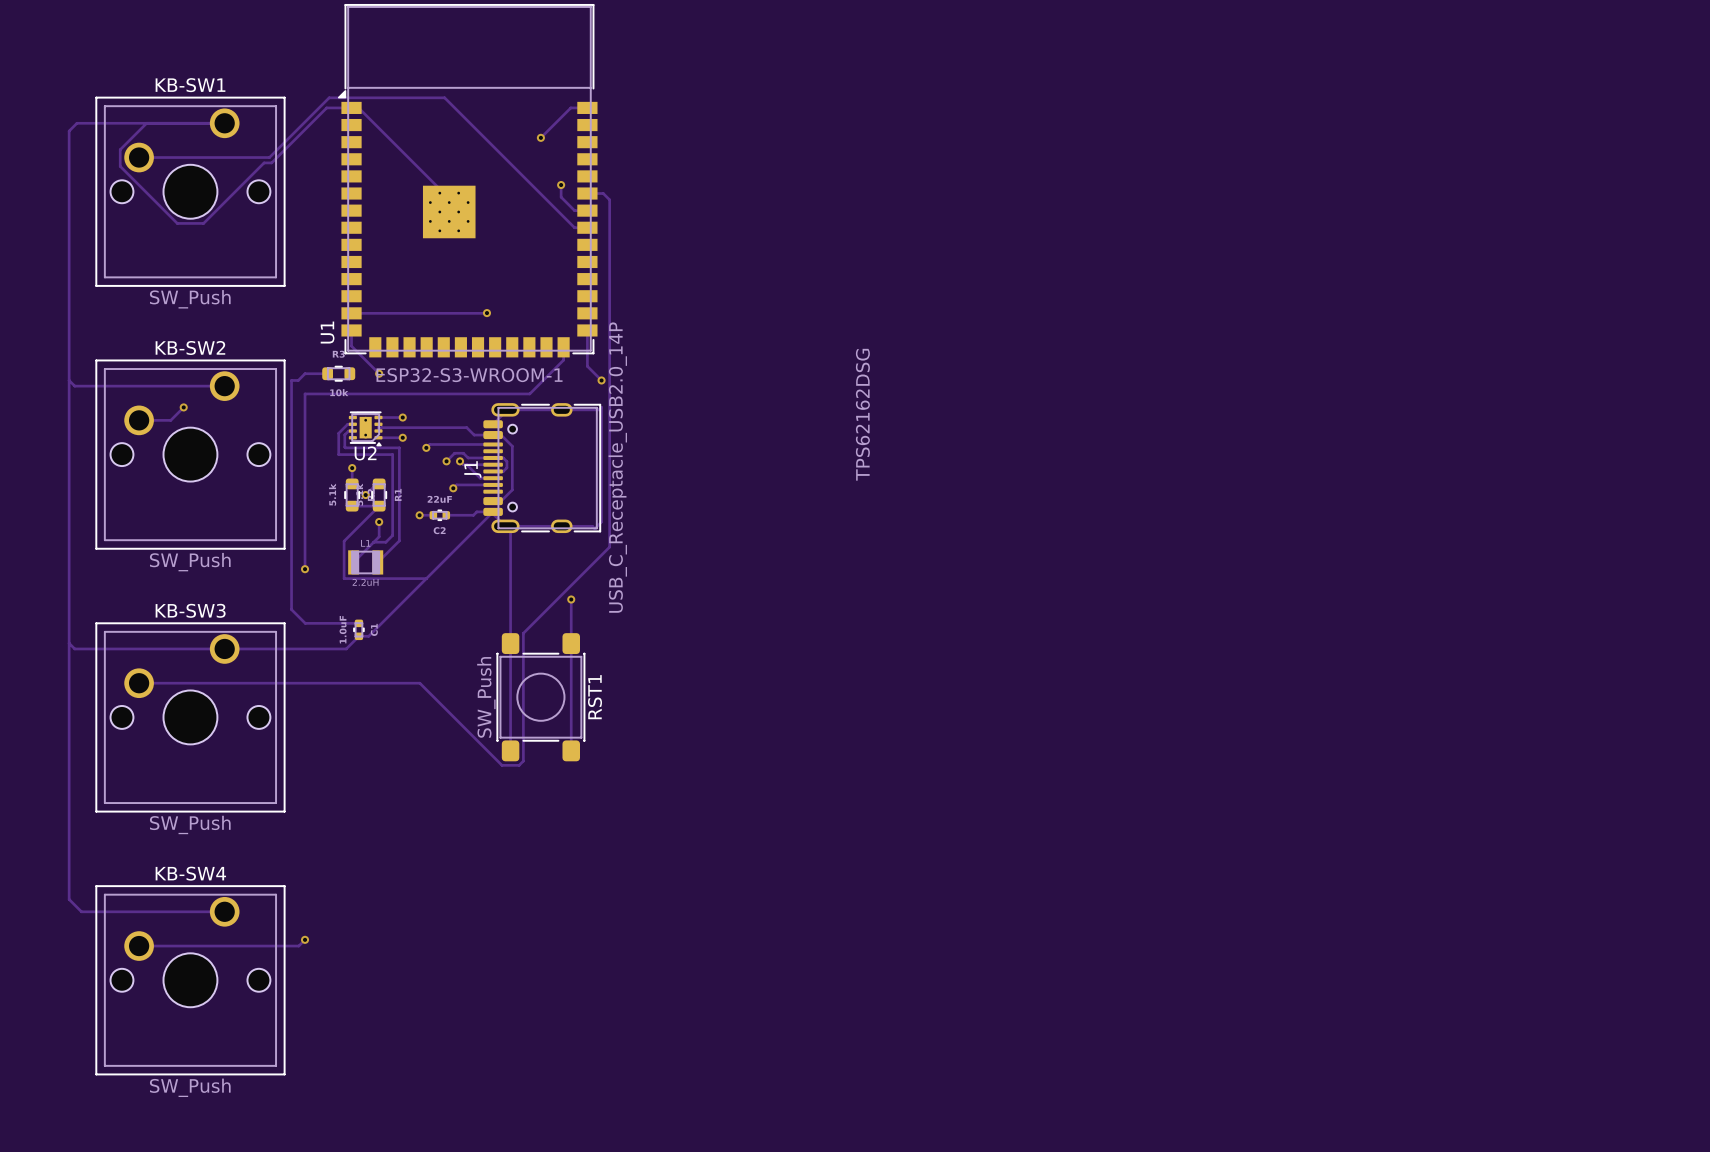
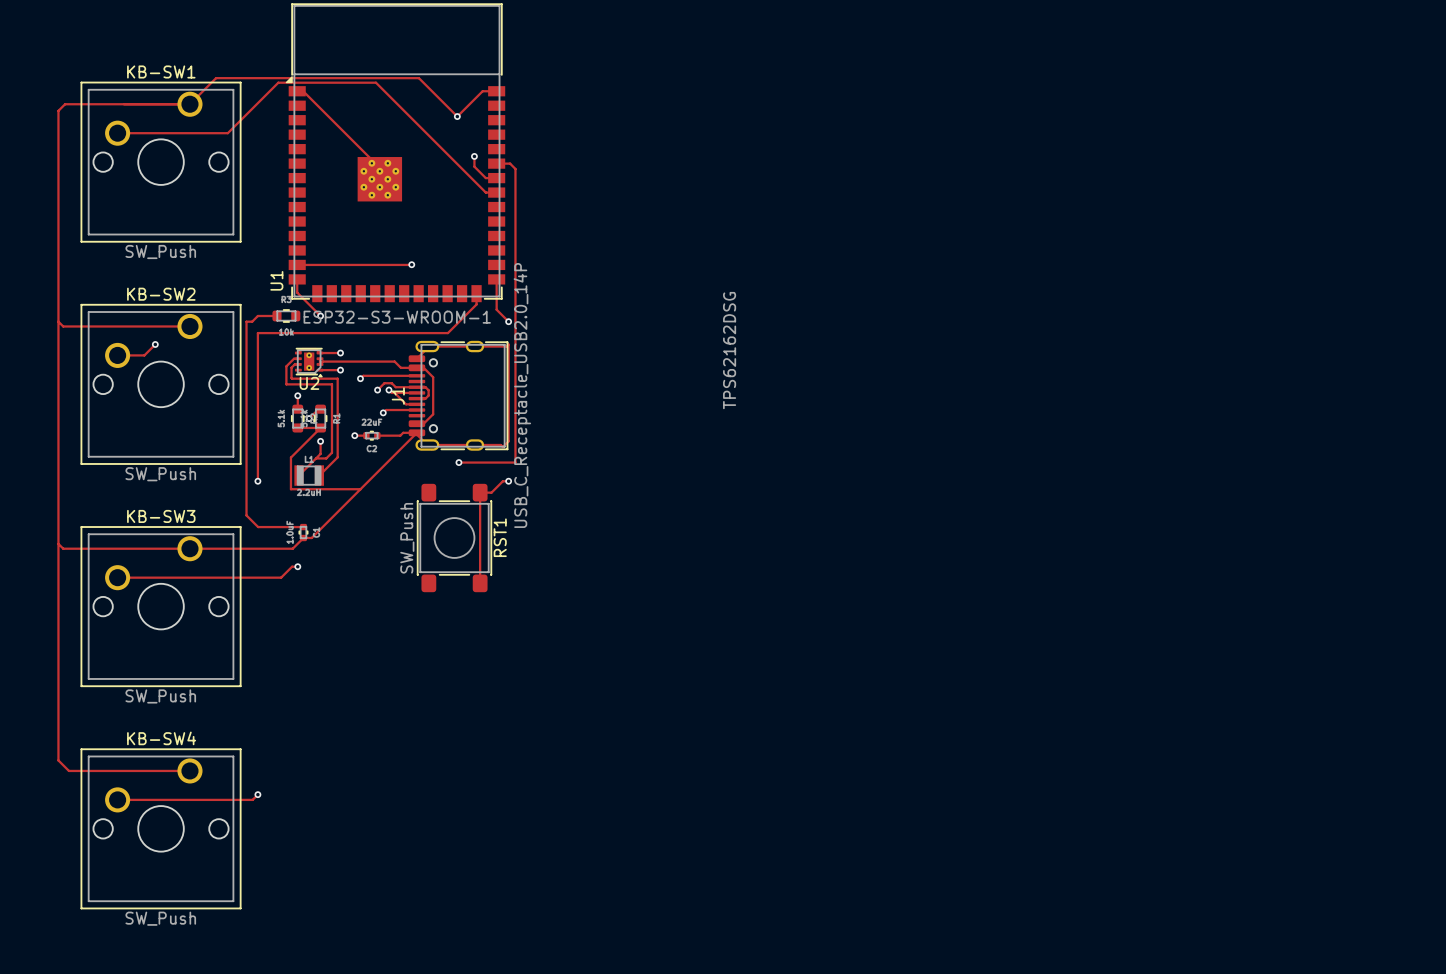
track: (351, 107) (326, 107) (271, 162) (264, 162) (203, 223) (177, 223) (120, 166) (120, 149) (146, 123) -> none
track: none -> (189, 104) (216, 78) (418, 78) (457, 116)
track: (510, 531) (510, 750) -> none
via: none -> (458, 462)
track: (609, 547) (523, 633) (523, 761) (519, 765) (502, 765) (419, 683) (332, 683) -> (515, 462) (458, 462)
track: none -> (508, 481) (502, 481) (491, 492) (480, 492) (480, 583)
via: none -> (508, 481)
track: (571, 599) (571, 750) -> none
via: (571, 599) -> none
track: none -> (297, 566) (292, 566) (281, 577)
via: none -> (297, 566)
RST1 position: (540, 697) -> (454, 538)

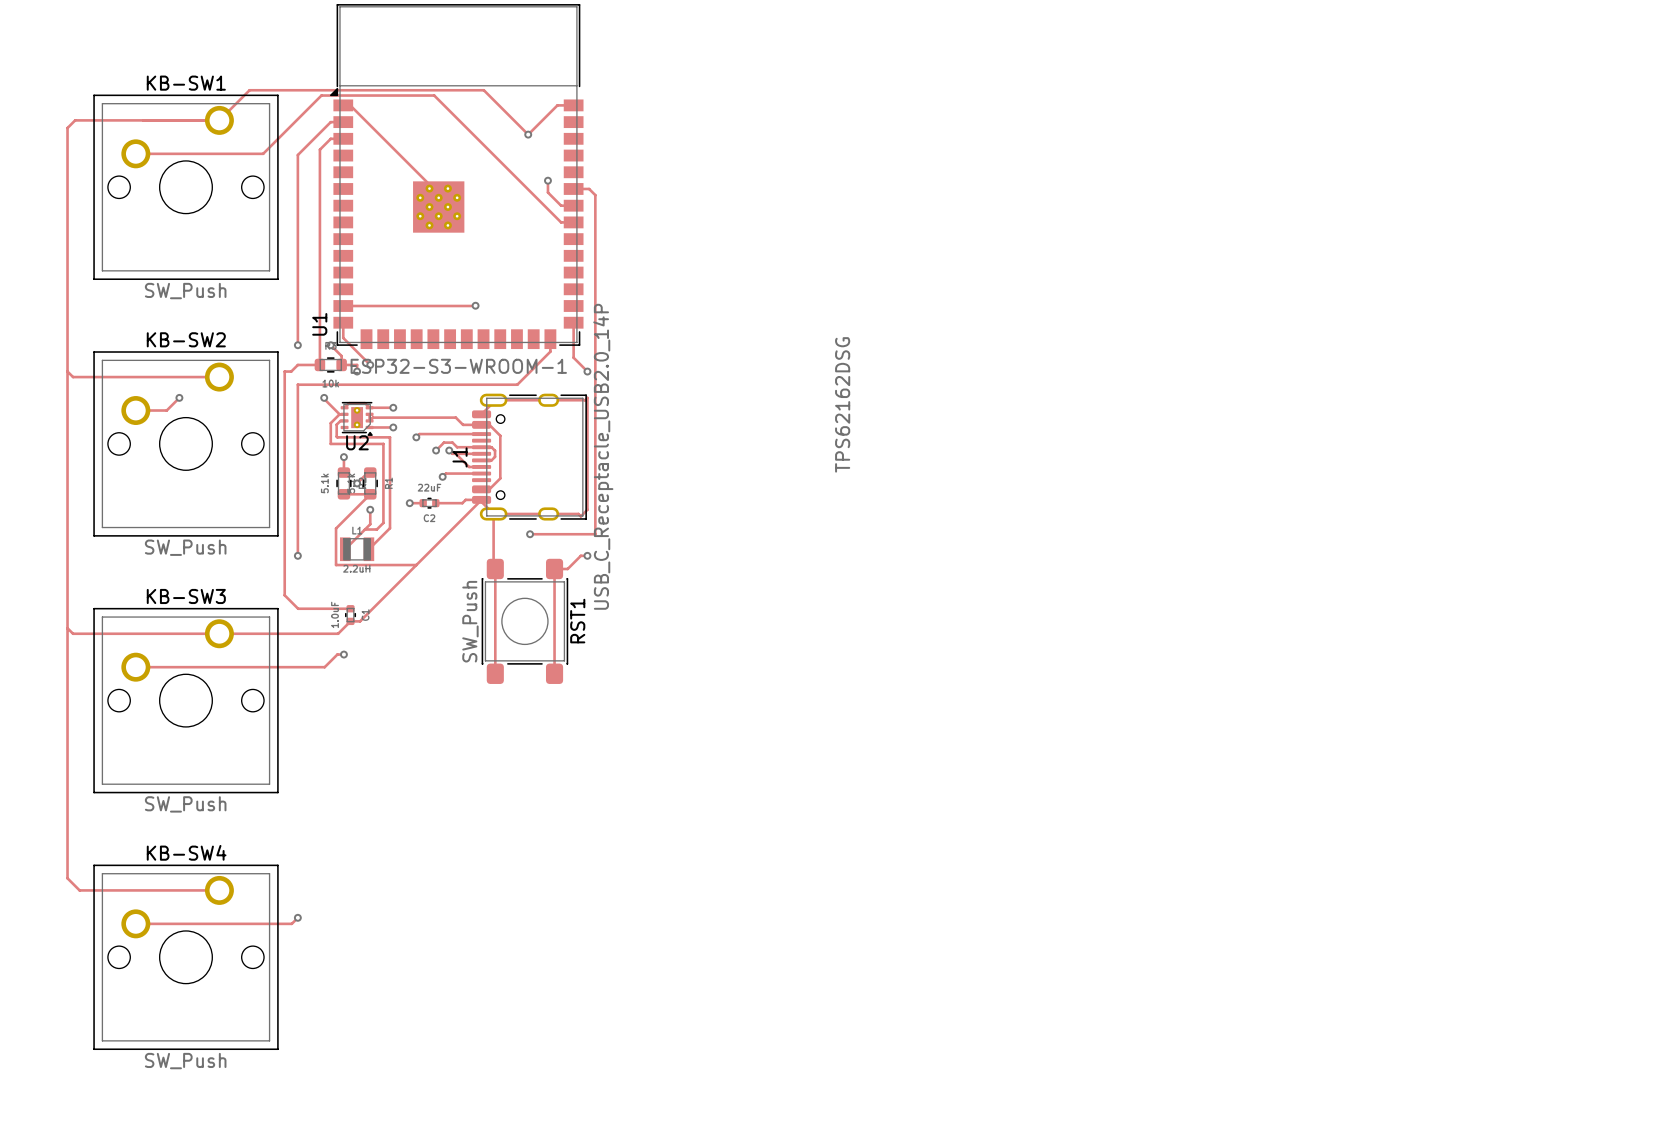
track: none -> (343, 122) (330, 122) (297, 155) (297, 345)
track: none -> (343, 138) (330, 138) (319, 149) (319, 364)
via: none -> (297, 345)
track: none -> (330, 345) (341, 356) (341, 364) (357, 364) (357, 371)
via: none -> (330, 345)
via: none -> (357, 371)
track: none -> (324, 397) (339, 414)
via: none -> (324, 397)
track: none -> (493, 513) (495, 673)

